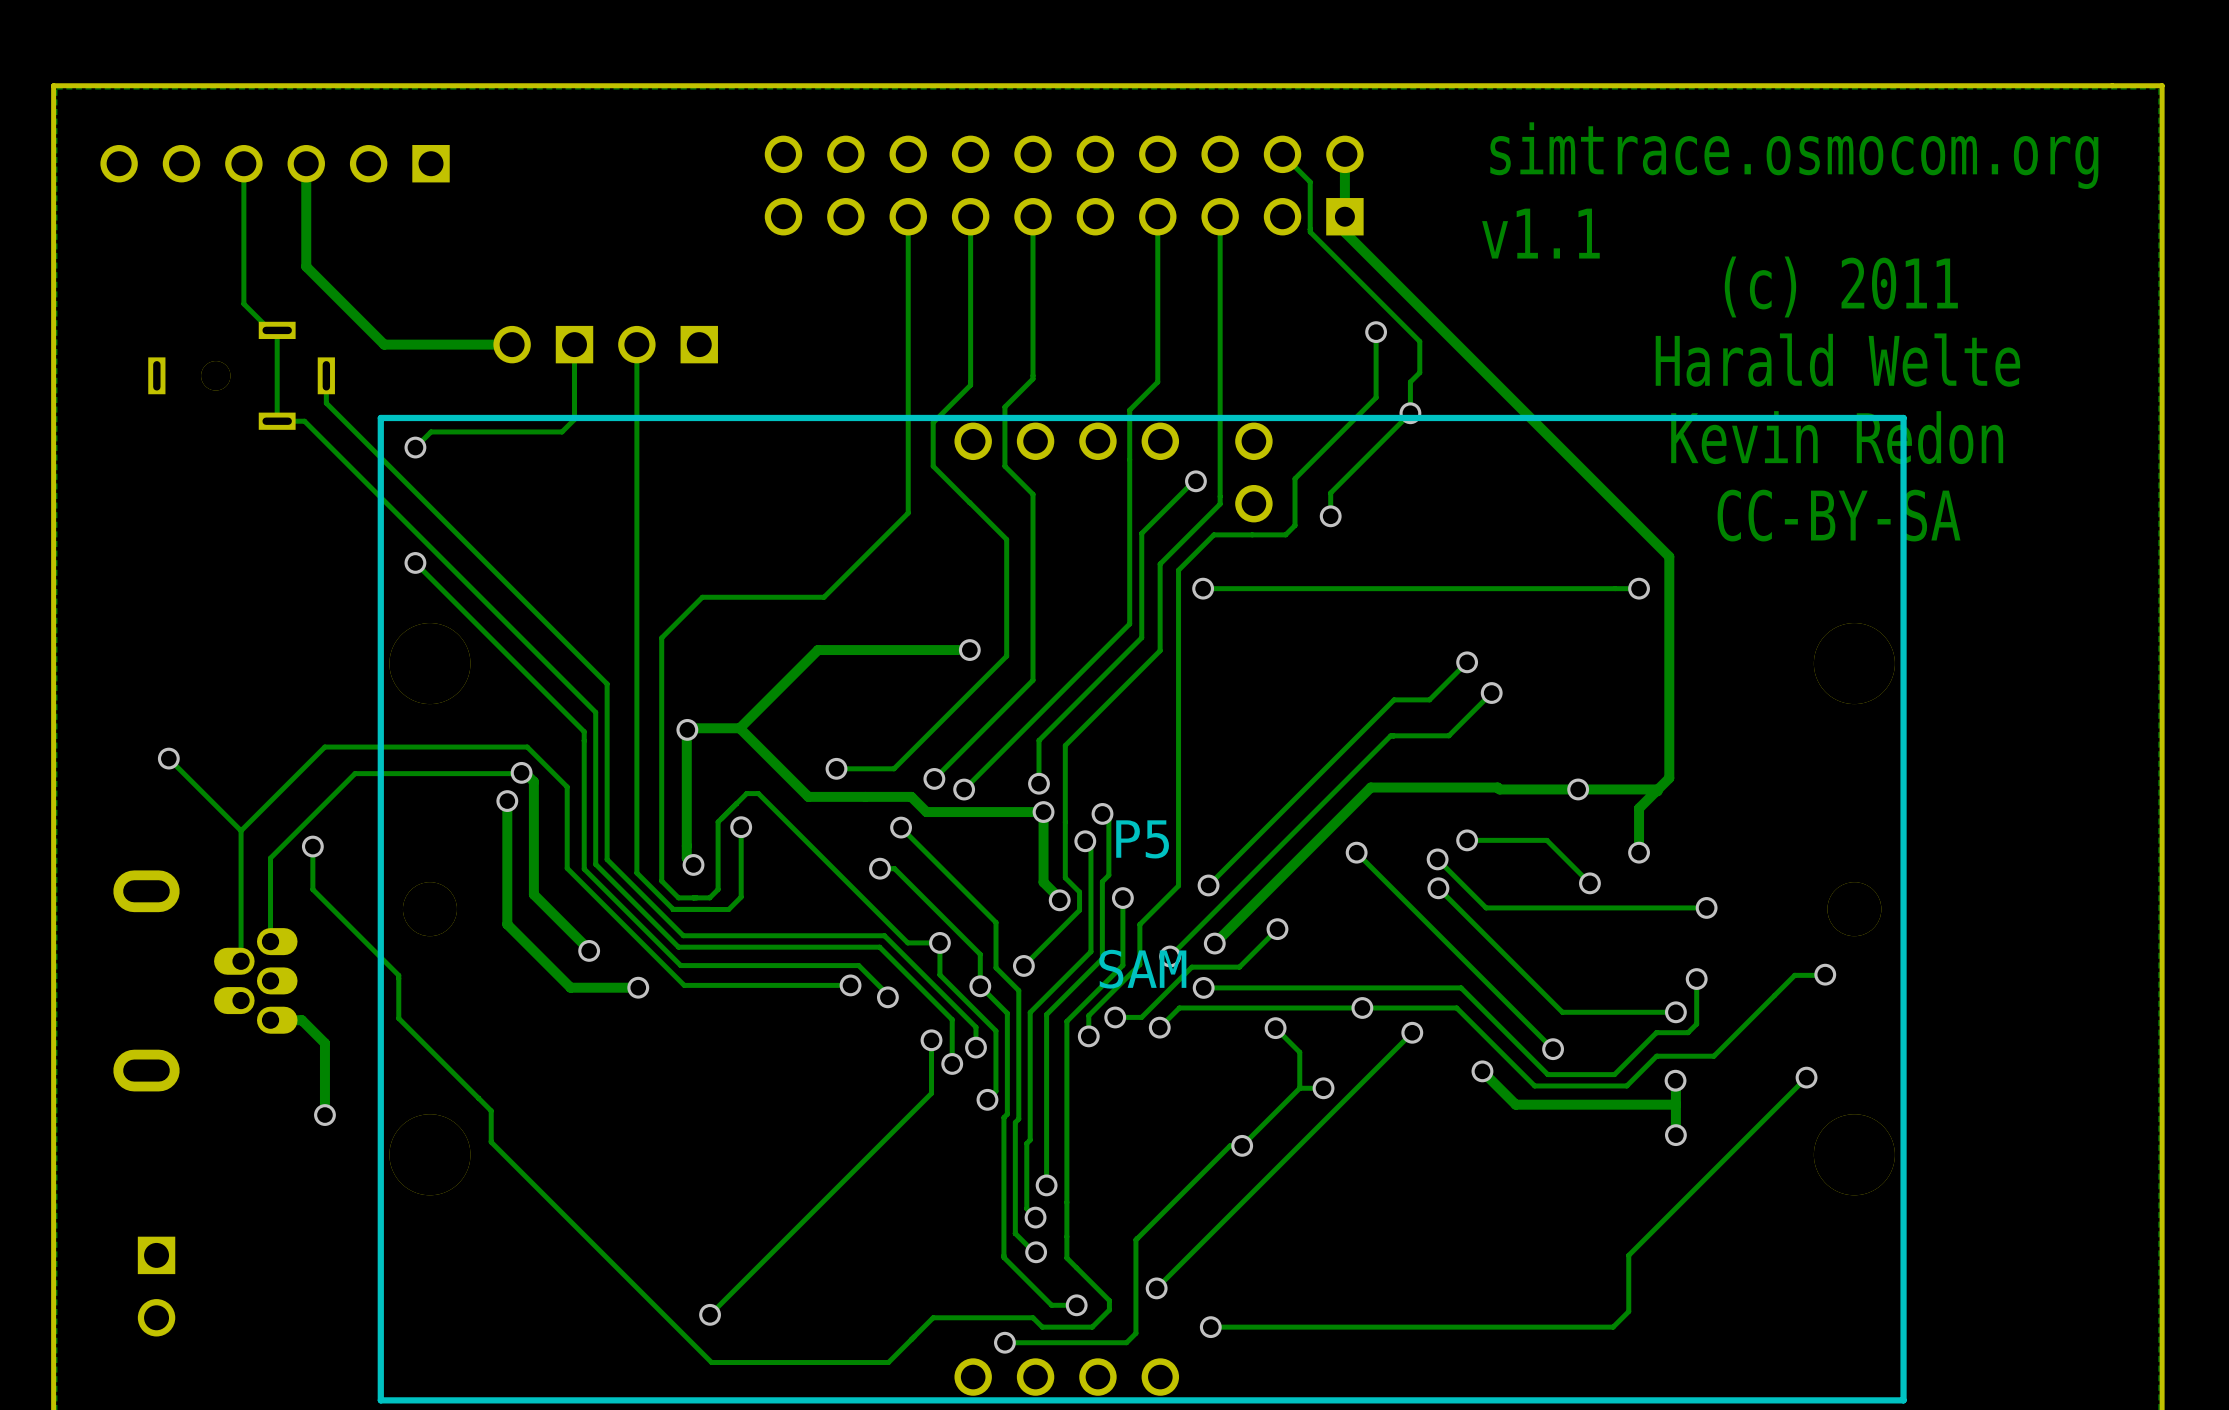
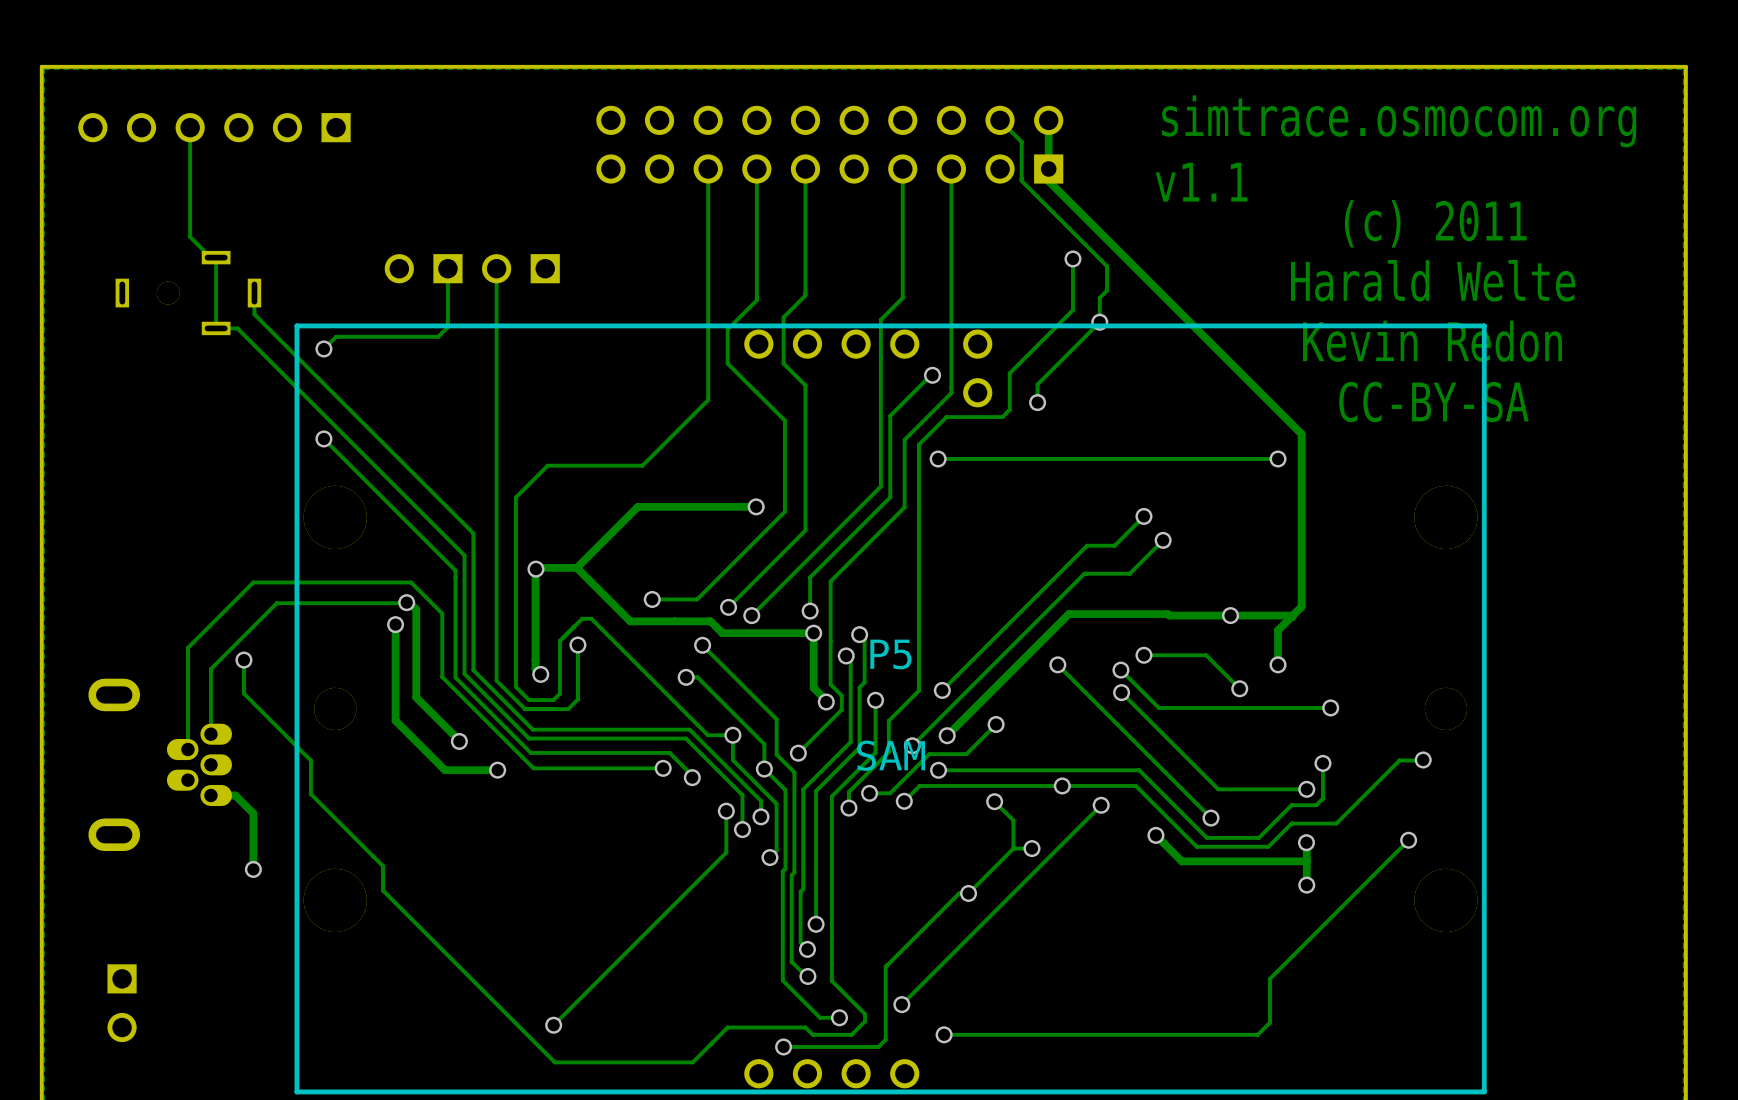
track: (306, 163) (306, 266) (384, 344) (512, 344) -> none
track: (168, 758) (241, 830) -> none
via: (168, 758) -> none

